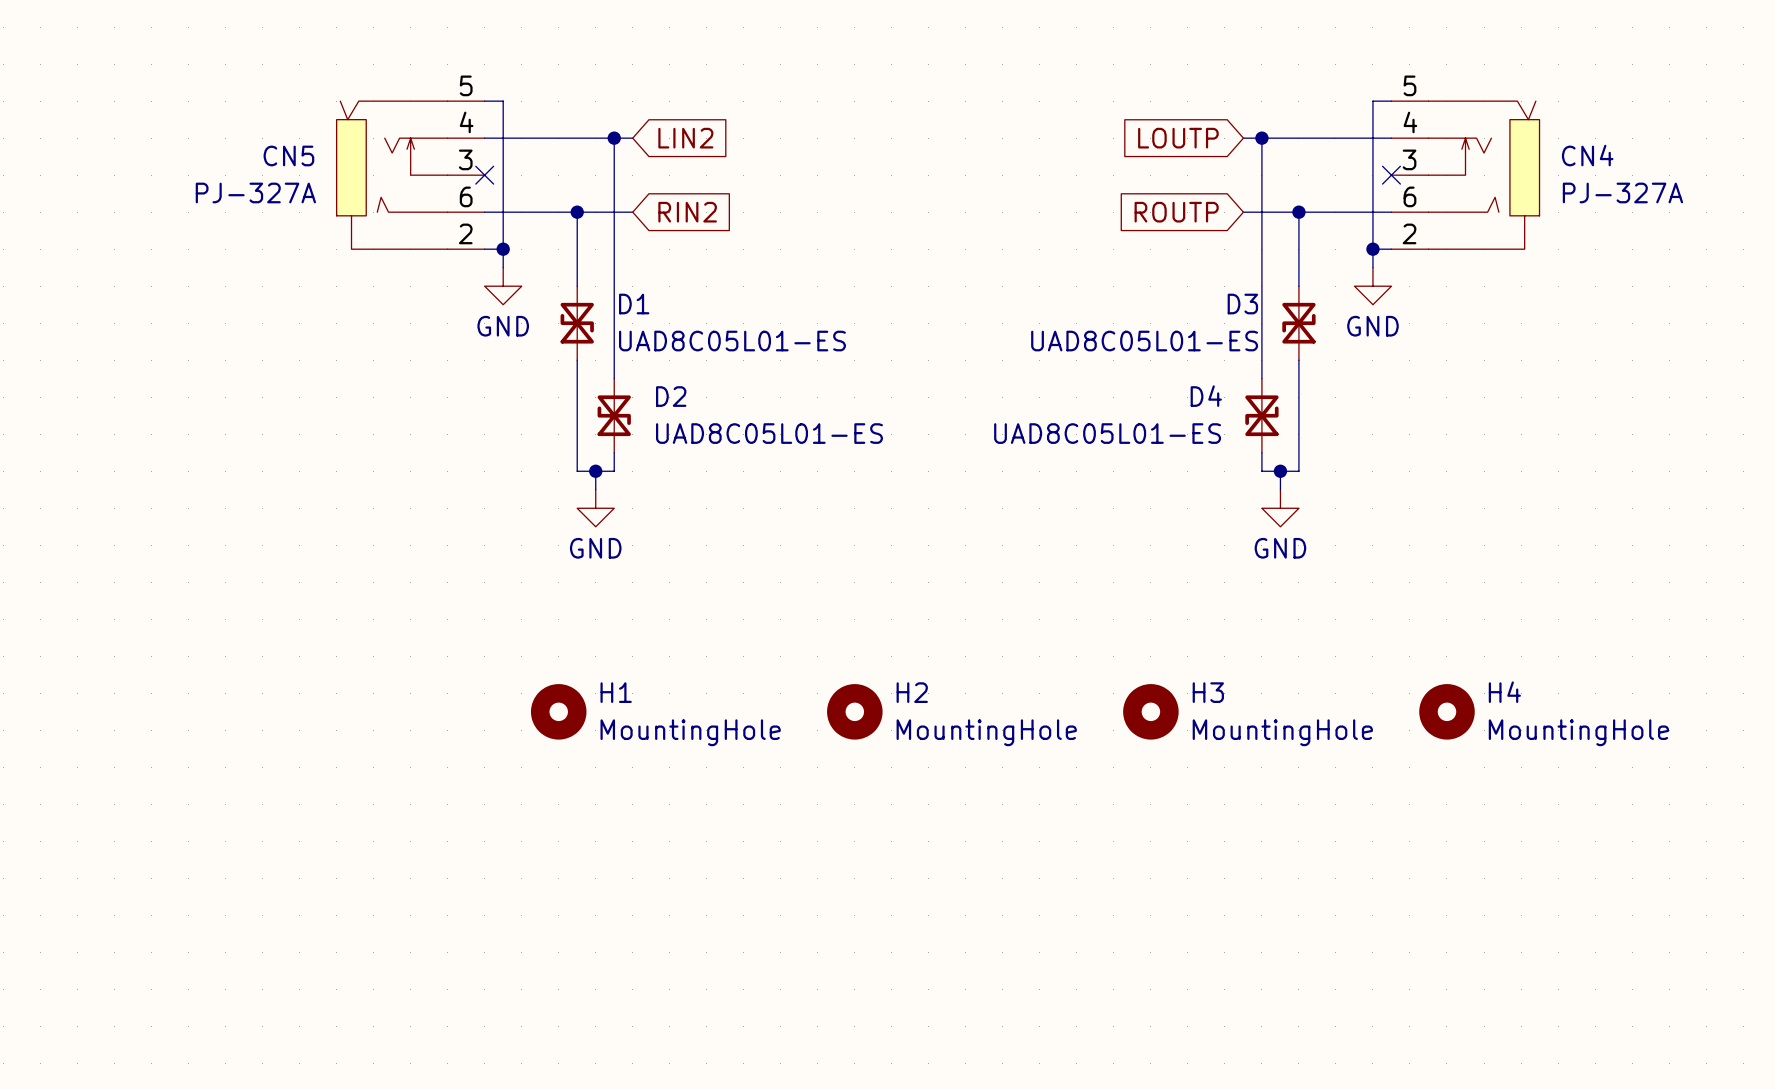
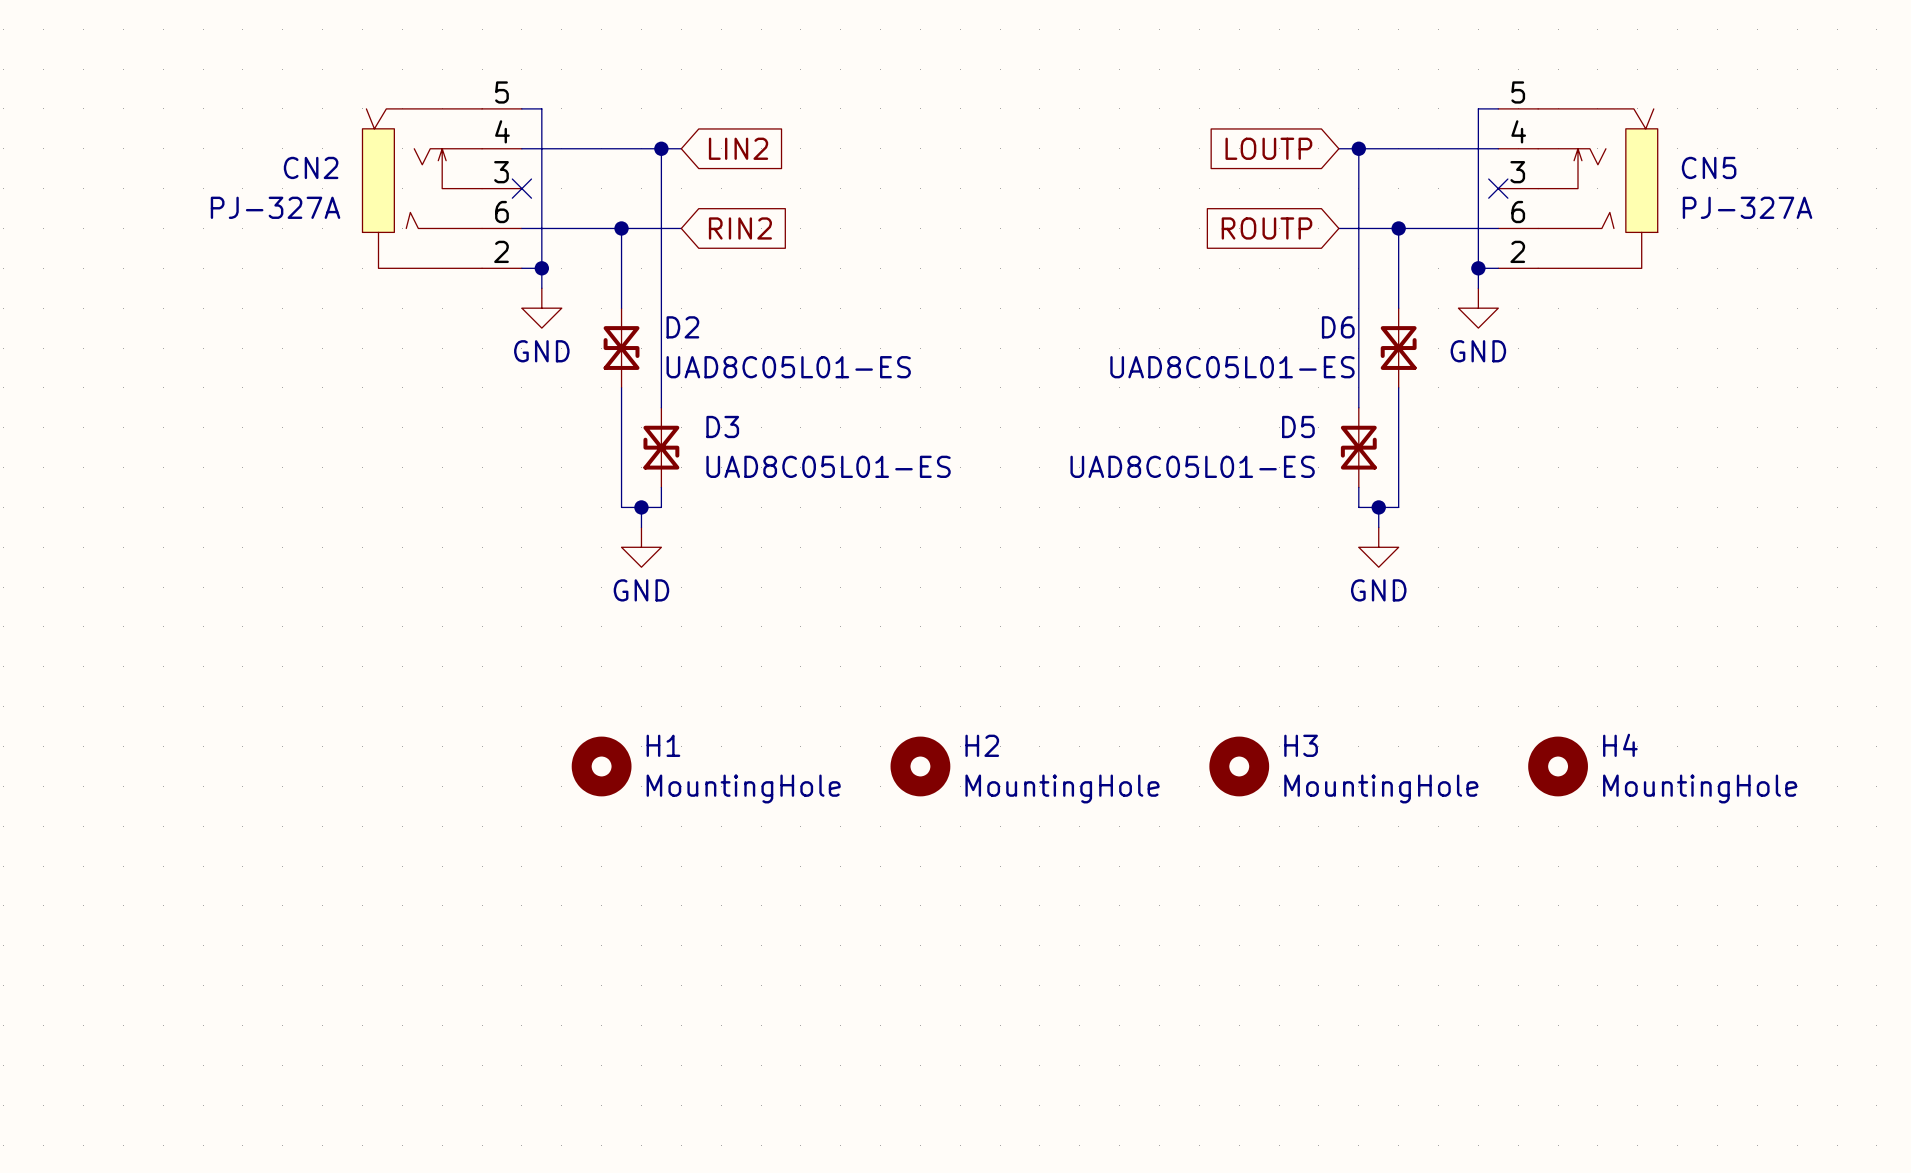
CN5 name: CN5 (288, 155) -> CN2 (311, 167)
CN4 name: CN4 (1587, 155) -> CN5 (1709, 167)
D1 name: D1 (634, 304) -> D2 (682, 327)
D3 name: D3 (1242, 304) -> D6 (1338, 327)
D2 name: D2 (671, 396) -> D3 (722, 426)
D4 name: D4 (1206, 396) -> D5 (1298, 426)

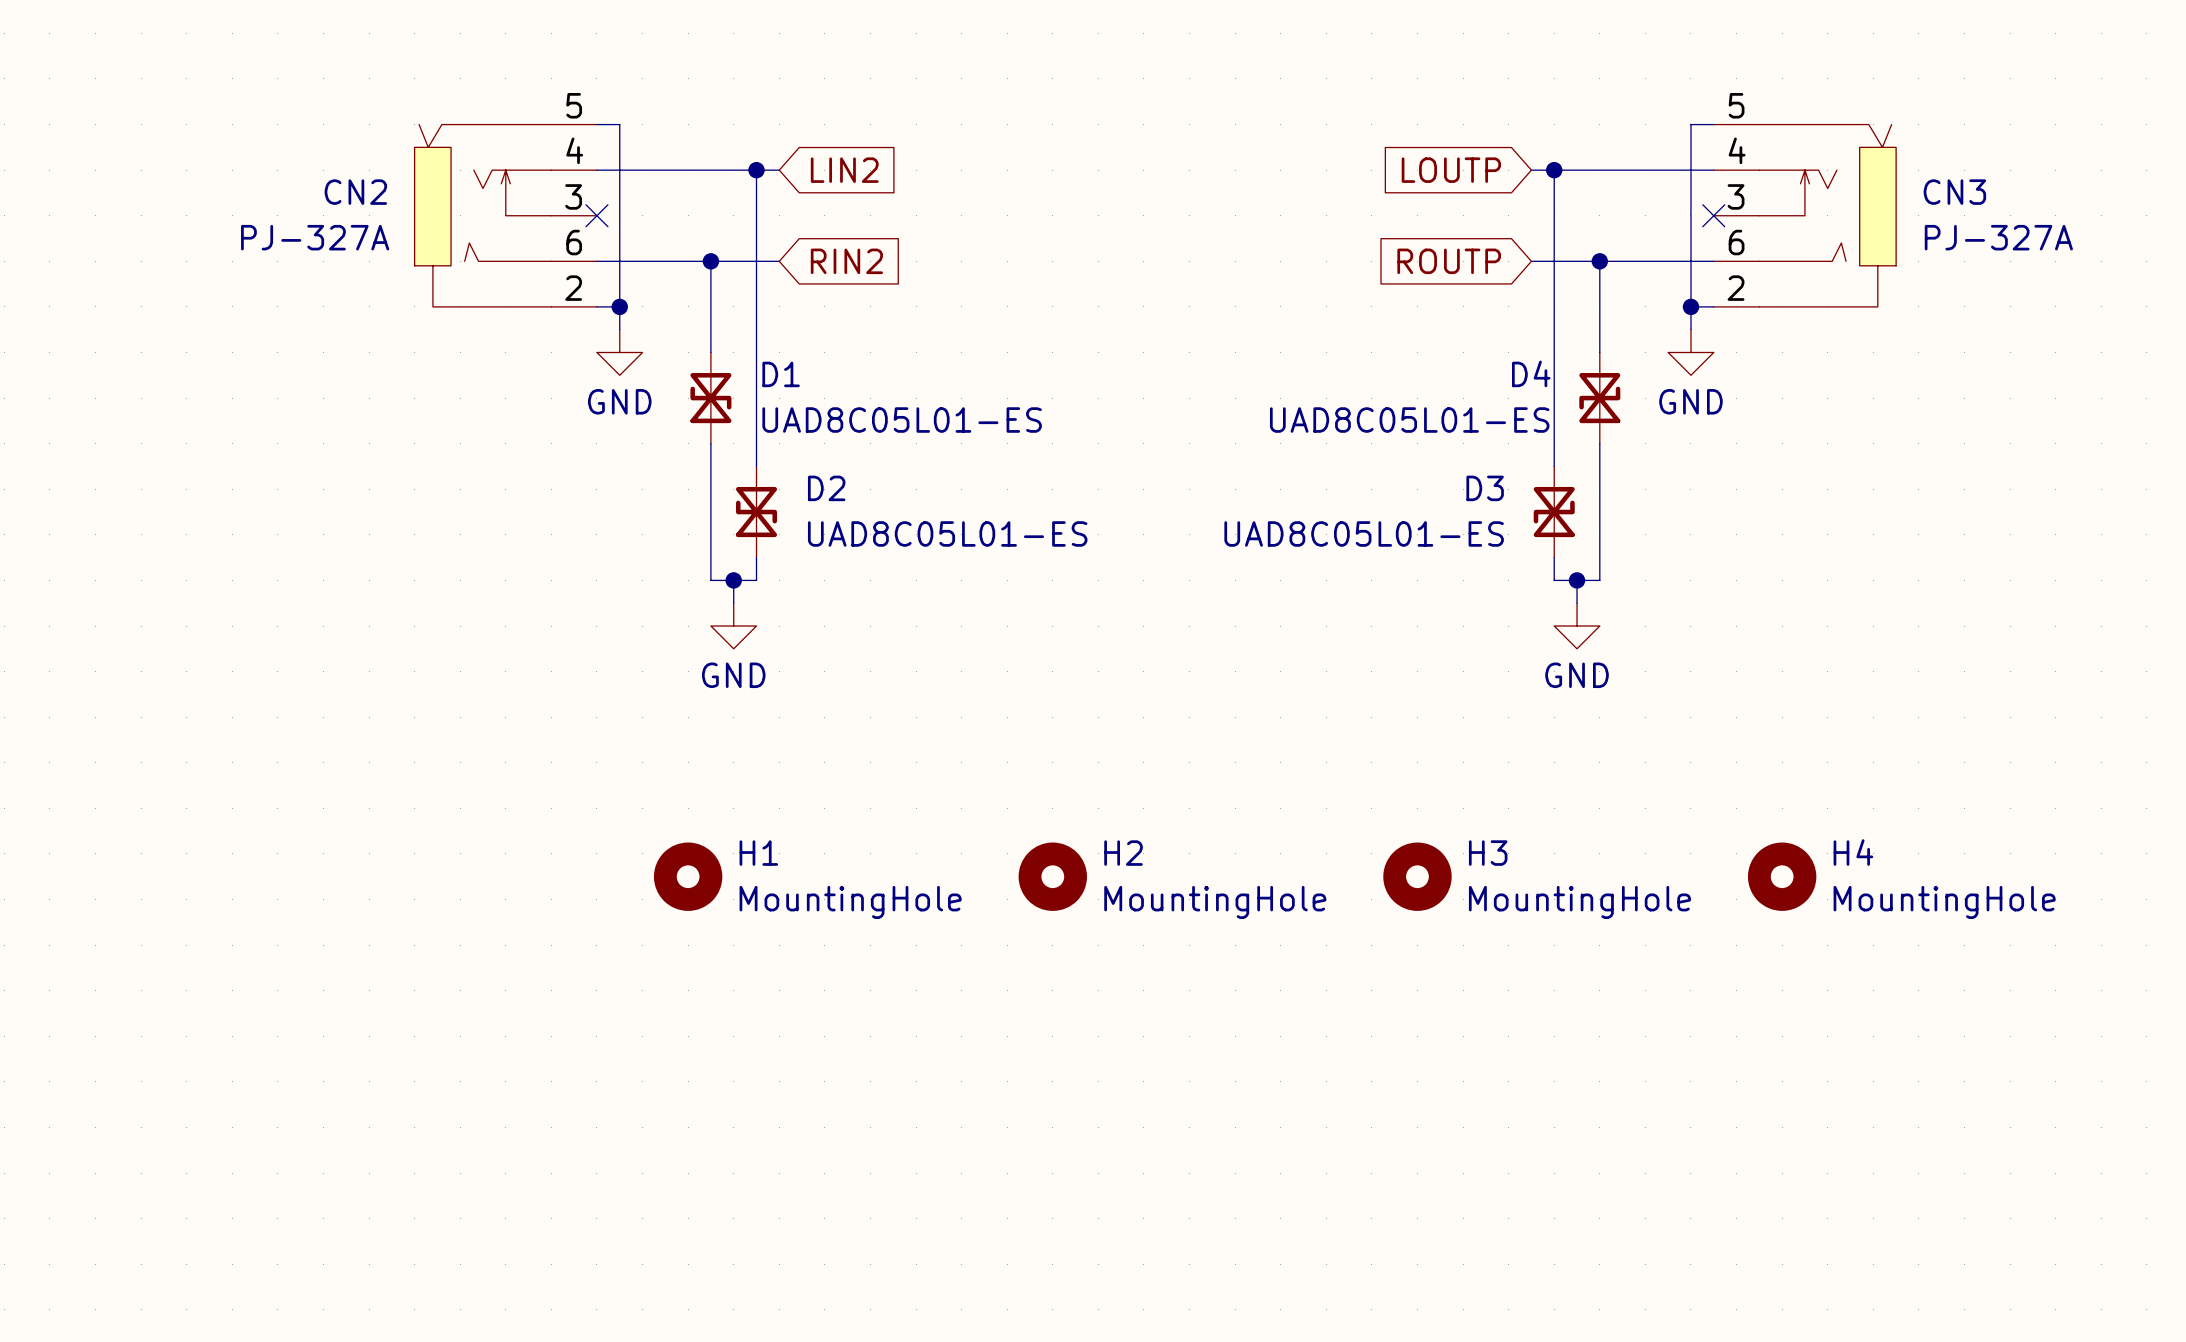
CN5 name: CN5 (1709, 167) -> CN3 (1954, 192)
D2 name: D2 (682, 327) -> D1 (781, 374)
D6 name: D6 (1338, 327) -> D4 (1531, 373)
D3 name: D3 (722, 426) -> D2 (826, 488)
D5 name: D5 (1298, 426) -> D3 (1485, 488)

